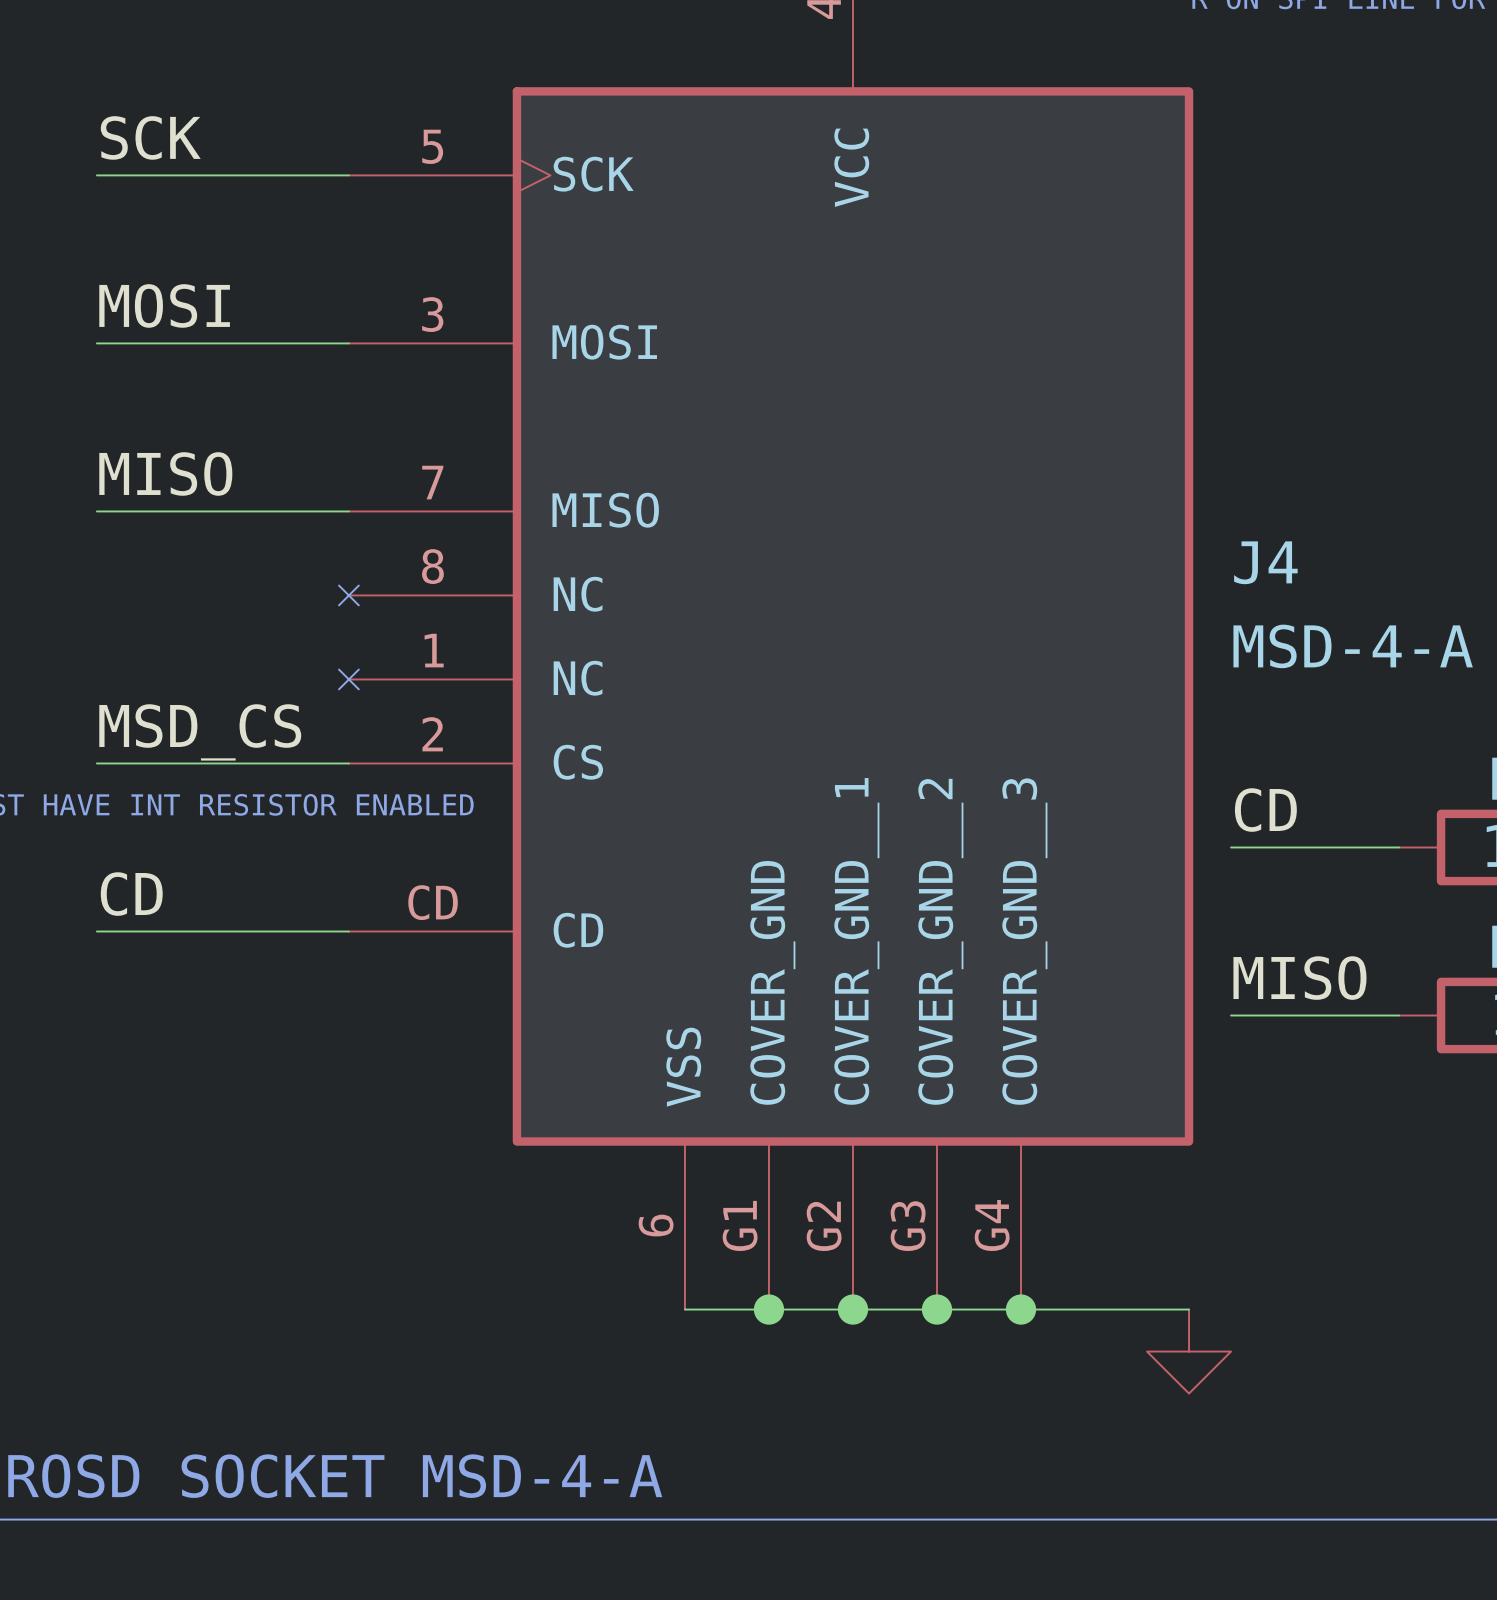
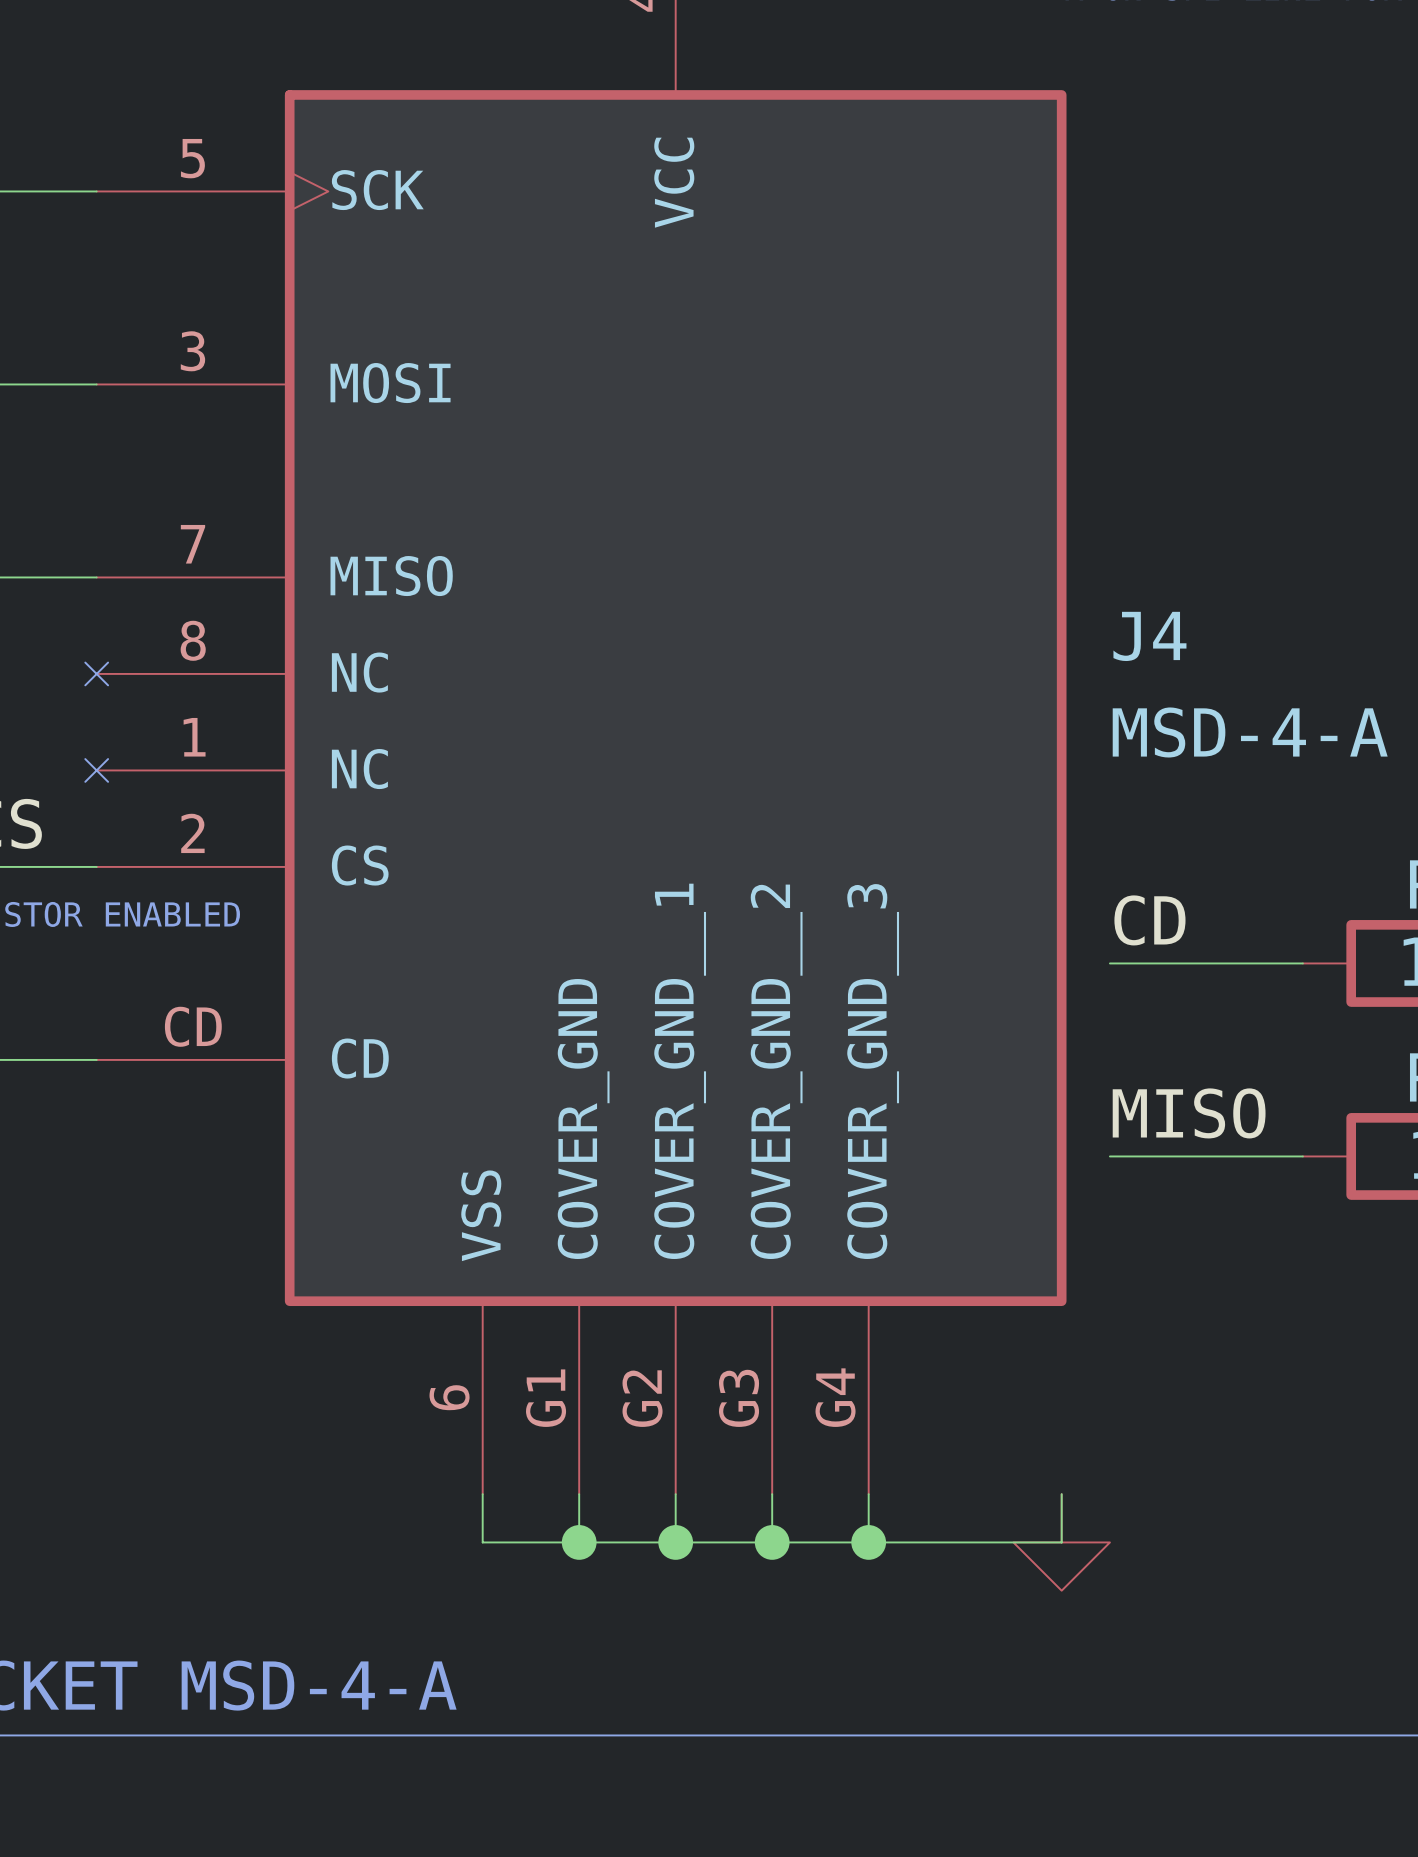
wire: (684, 1309) (1189, 1309) -> (482, 1494) (482, 1542) (1061, 1542) (1061, 1494)
wire: none -> (579, 1494) (579, 1542)
junction position: (768, 1309) -> (579, 1542)
wire: none -> (675, 1494) (675, 1542)
junction position: (852, 1309) -> (675, 1542)
wire: none -> (772, 1494) (772, 1542)
junction position: (936, 1309) -> (772, 1542)
wire: none -> (868, 1494) (868, 1542)
junction position: (1021, 1309) -> (868, 1542)

